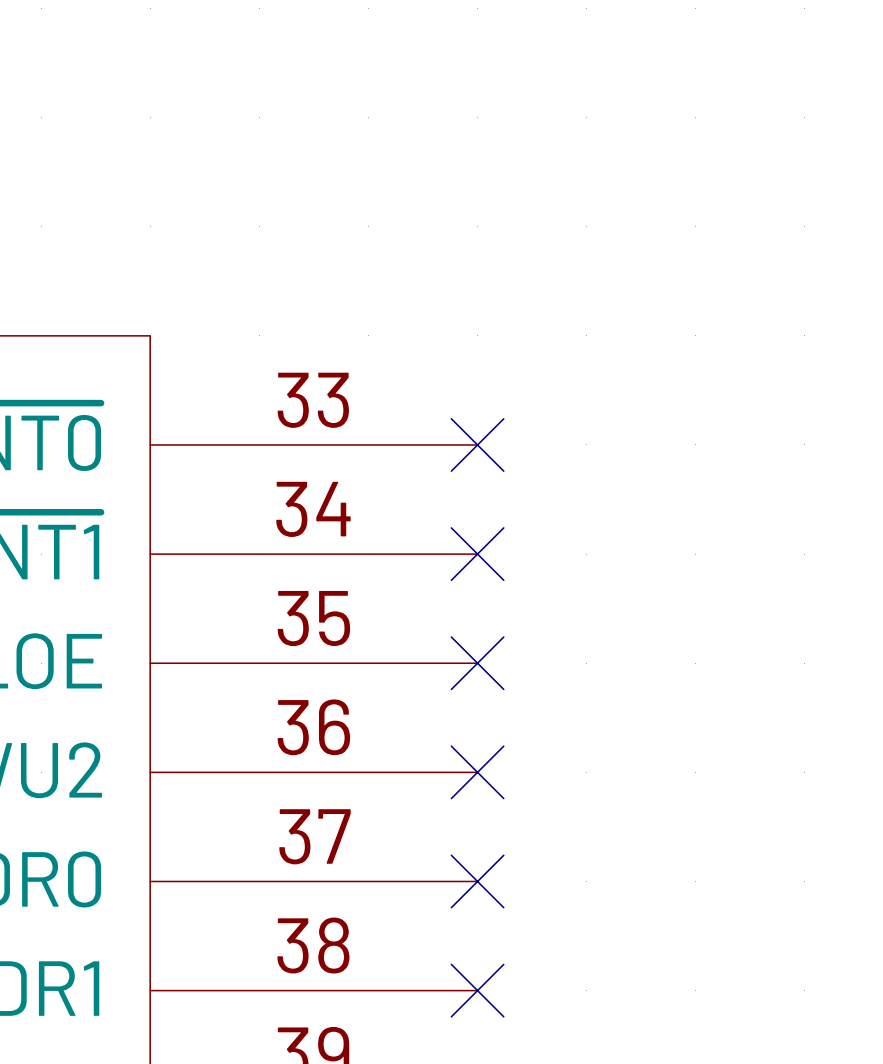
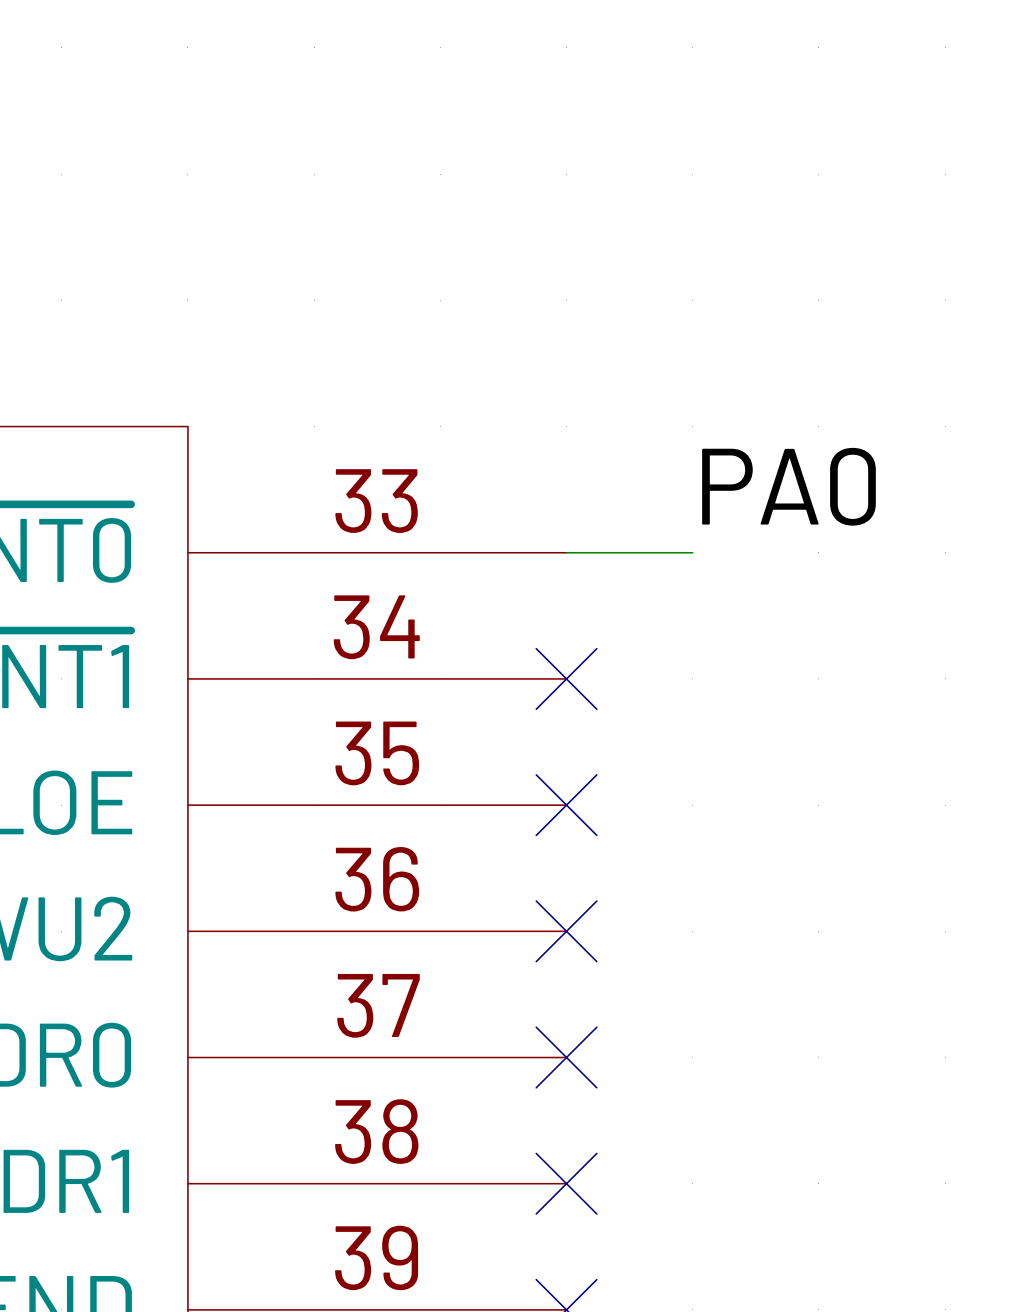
label: none -> PA0 (789, 486)
wire: none -> (566, 552) (692, 552)
no-connect mark: (477, 444) -> none

